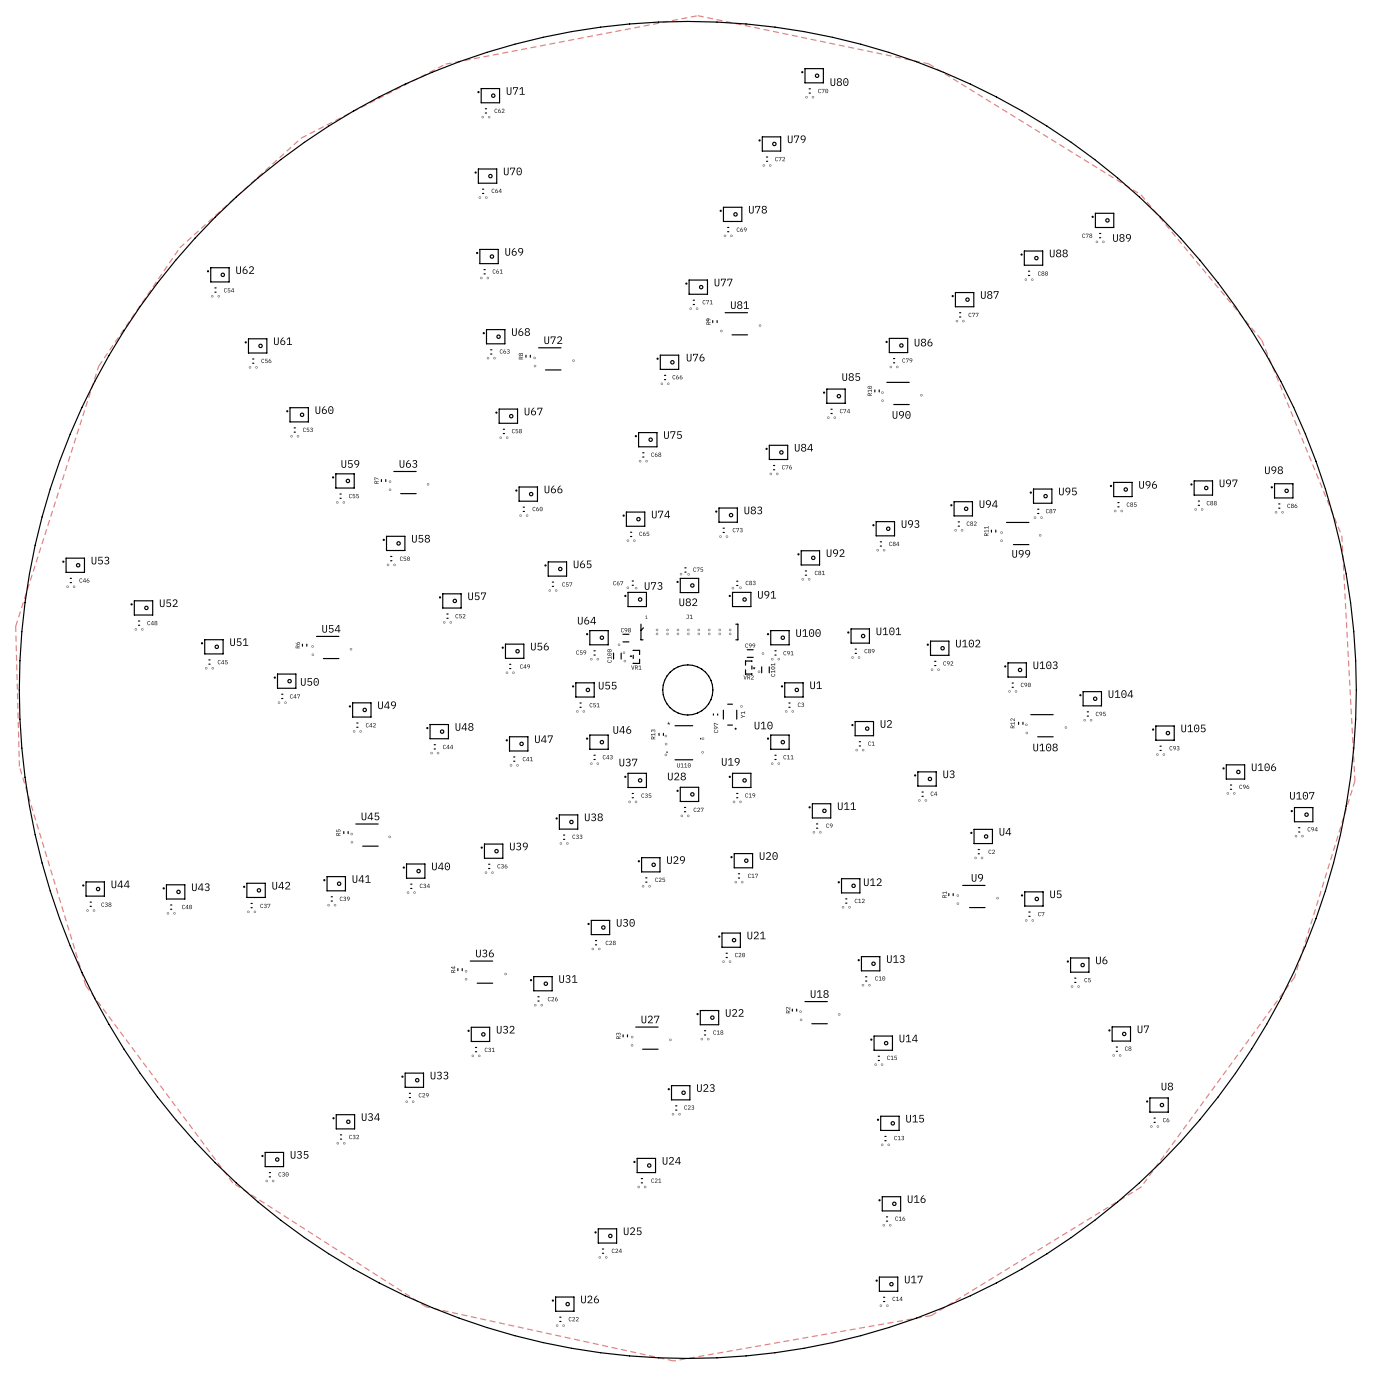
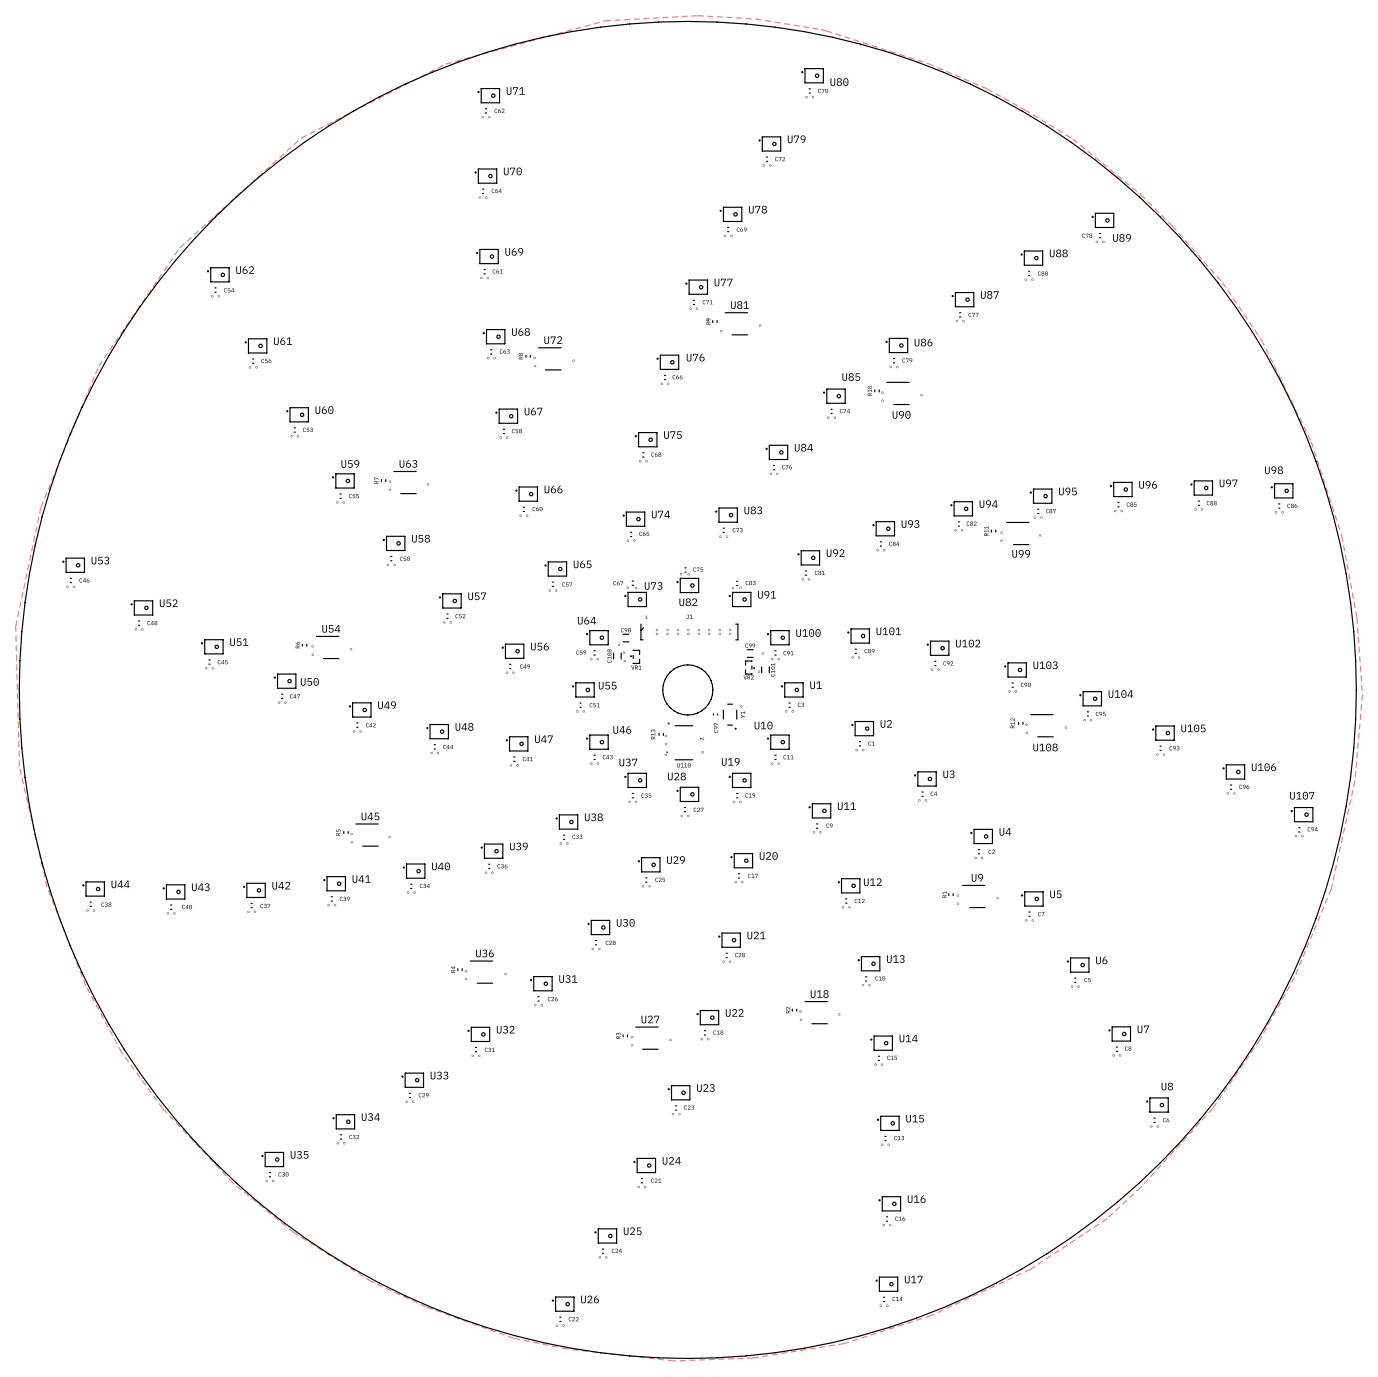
zone outline: (445, 64) (697, 15) (928, 63) (1141, 194) (1261, 340) (1341, 535) (1354, 780) (1294, 977) (1141, 1187) (931, 1315) (673, 1360) (426, 1306) (232, 1182) (85, 985) (19, 766) -> (445, 64) (605, 20) (697, 15) (755, 18) (826, 30) (928, 63) (987, 88) (1072, 138) (1141, 194) (1172, 225) (1222, 282) (1261, 340) (1311, 441) (1341, 535) (1356, 617) (1362, 694) (1354, 780) (1331, 889) (1294, 977) (1259, 1039) (1212, 1108) (1141, 1187) (1107, 1218) (1030, 1269) (931, 1315) (844, 1343) (753, 1357) (673, 1360) (567, 1349) (513, 1338) (426, 1306) (371, 1281) (293, 1232) (232, 1182) (162, 1108) (121, 1052) (85, 985) (47, 886) (19, 766)
zone outline: (98, 366) (15, 626) -> (98, 366) (40, 507) (15, 626)

